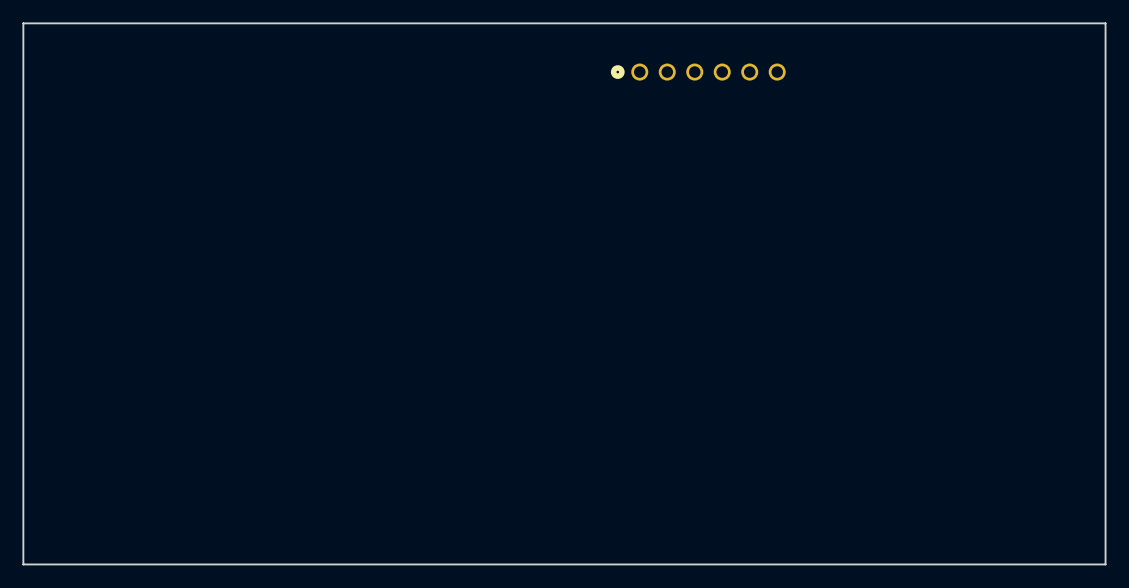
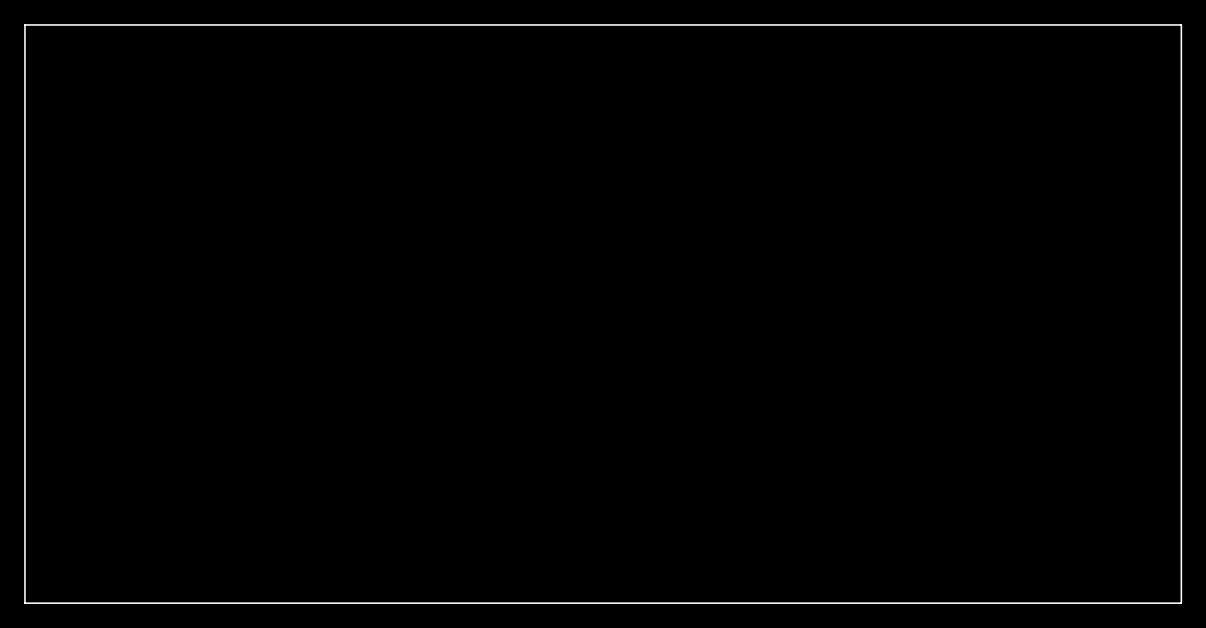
part: (698, 72) -> none

